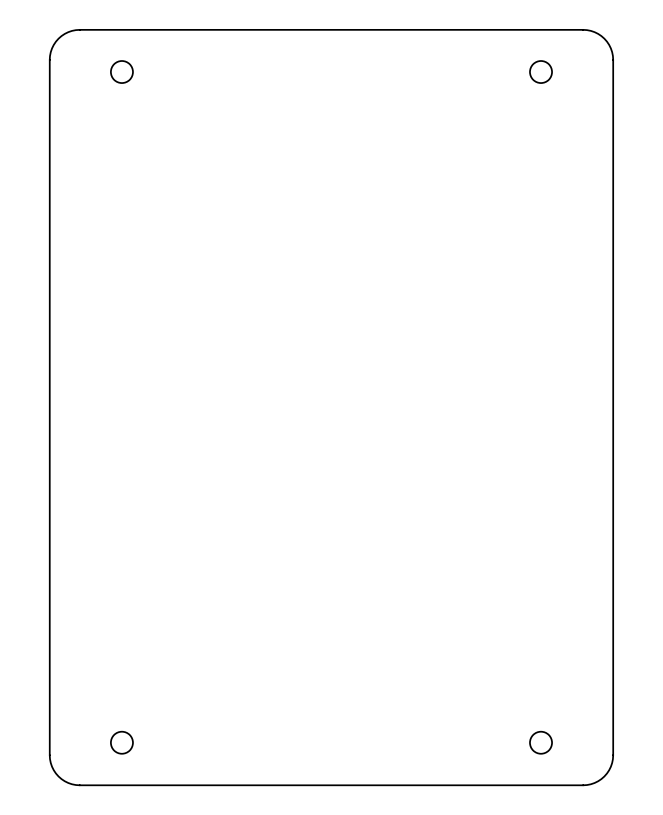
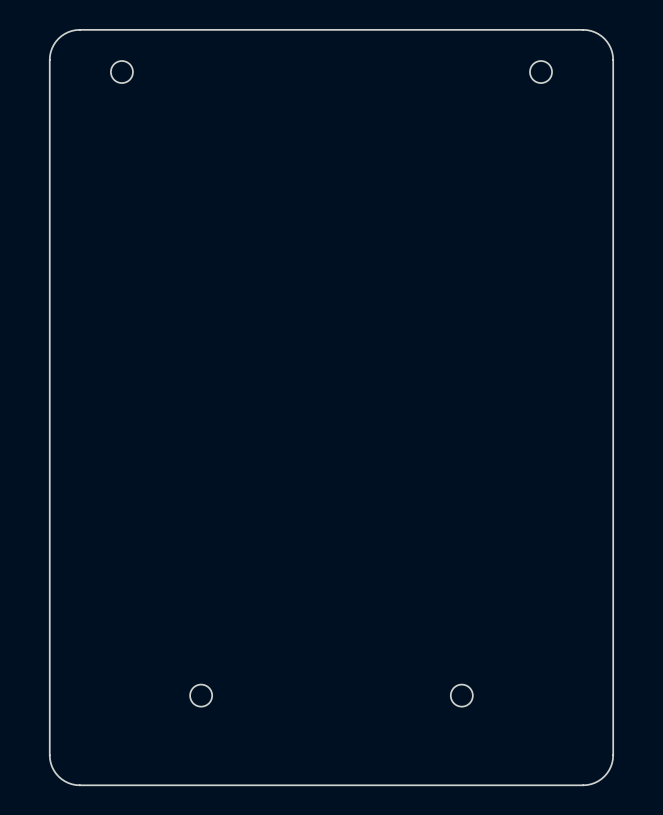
round board edge position: (121, 742) -> (201, 695)
round board edge position: (541, 742) -> (461, 695)

